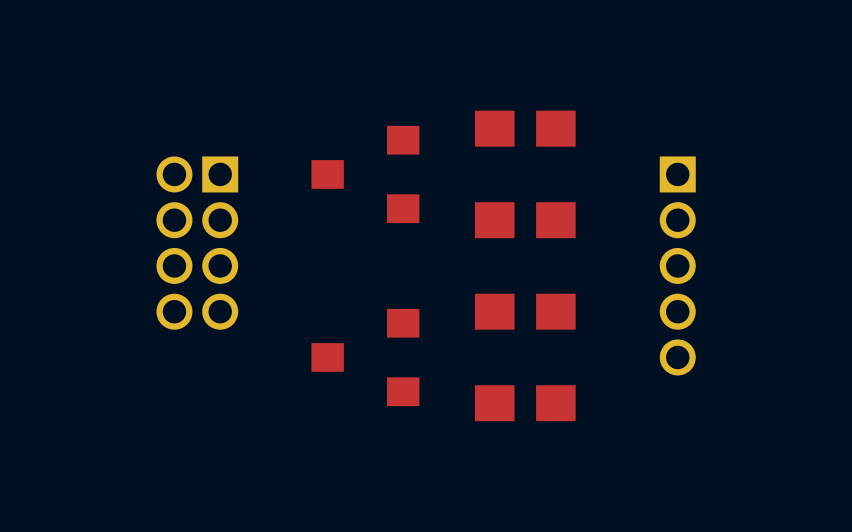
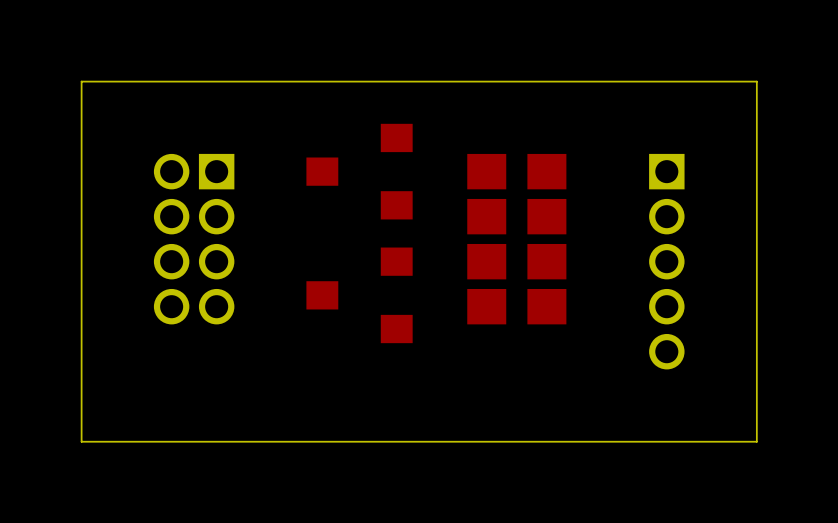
board edge: none -> (756, 81) (756, 441) (81, 441) (81, 81) (756, 81)
part position: (525, 128) -> (516, 171)
part: none -> (516, 261)
part position: (365, 357) -> (359, 295)
part: (525, 403) -> none

